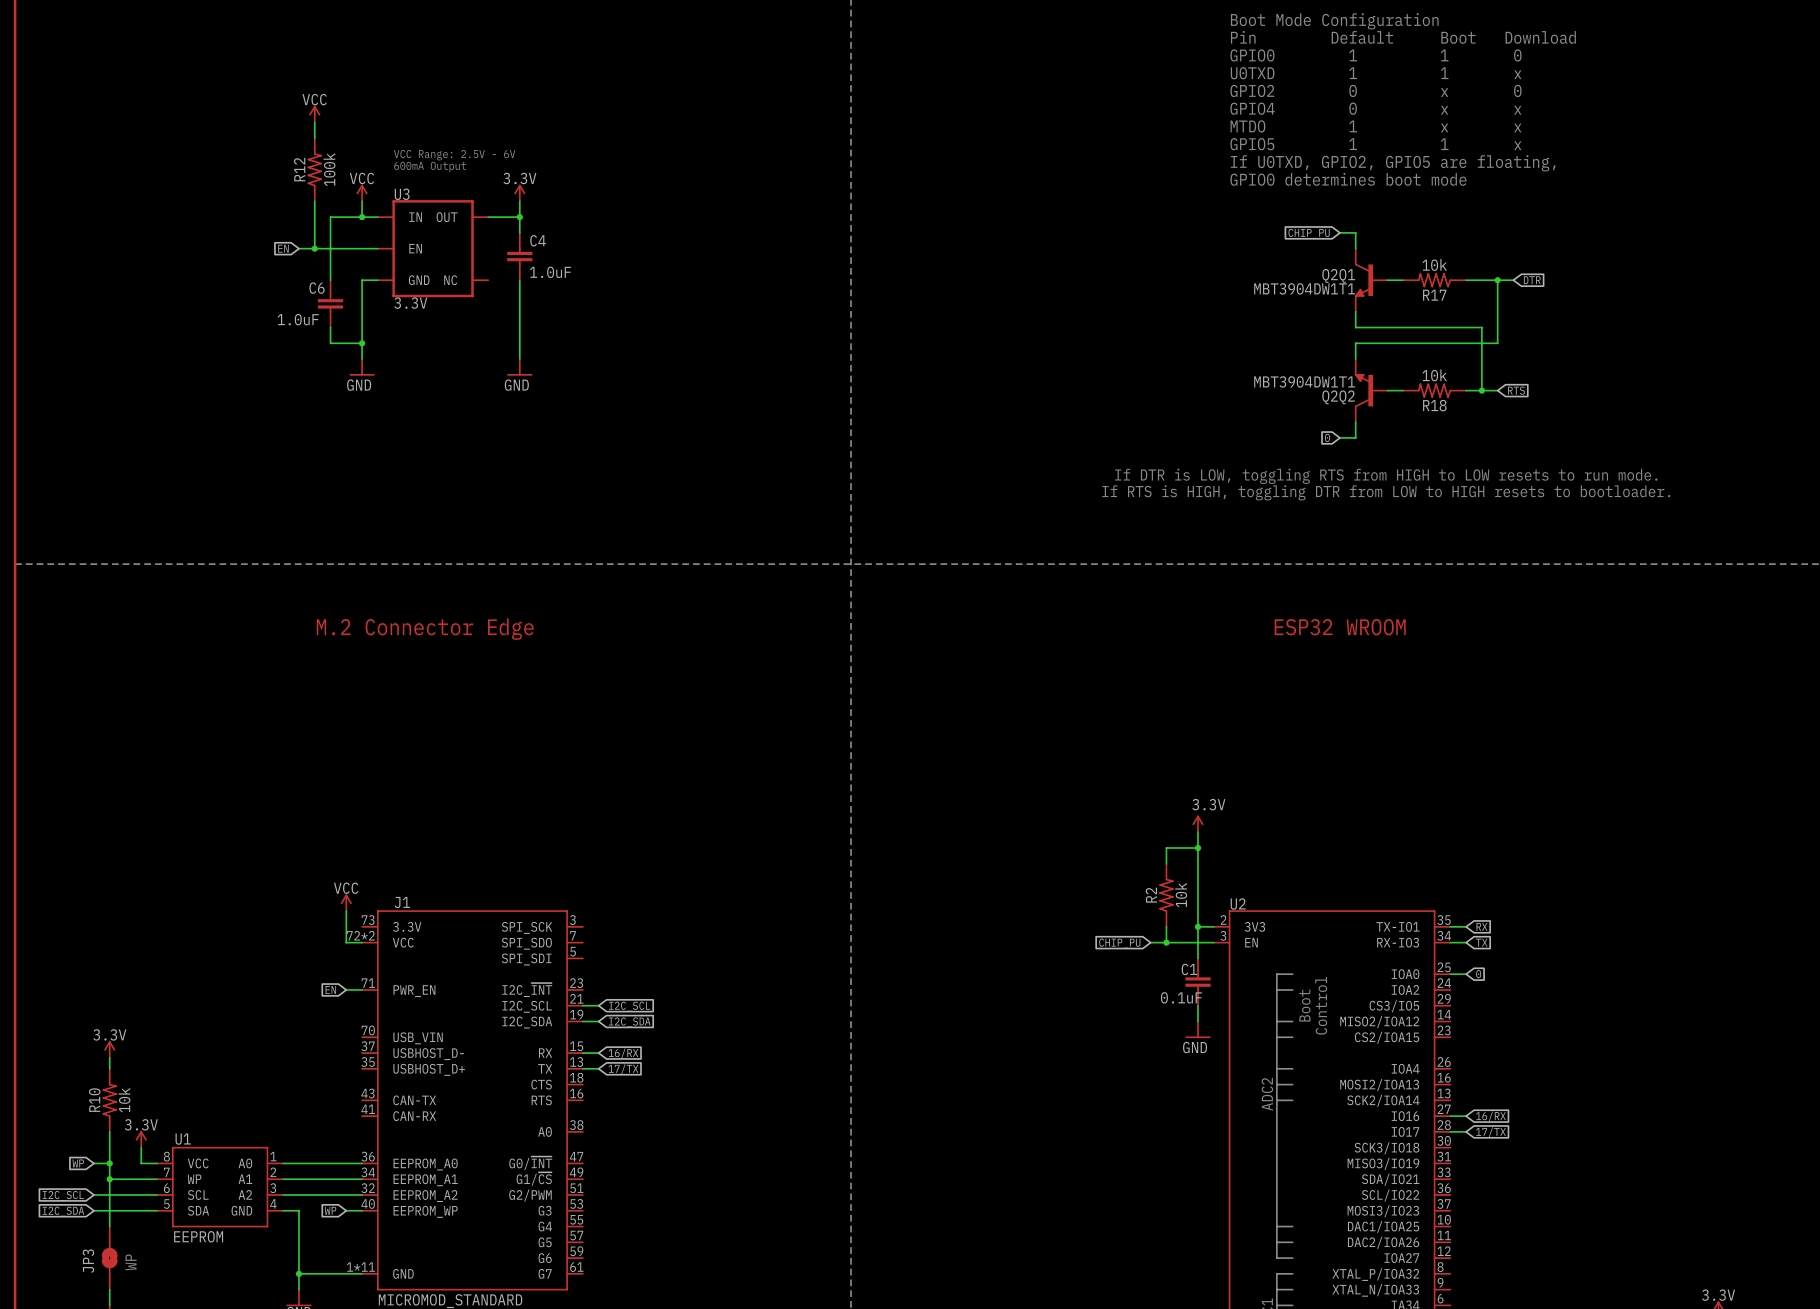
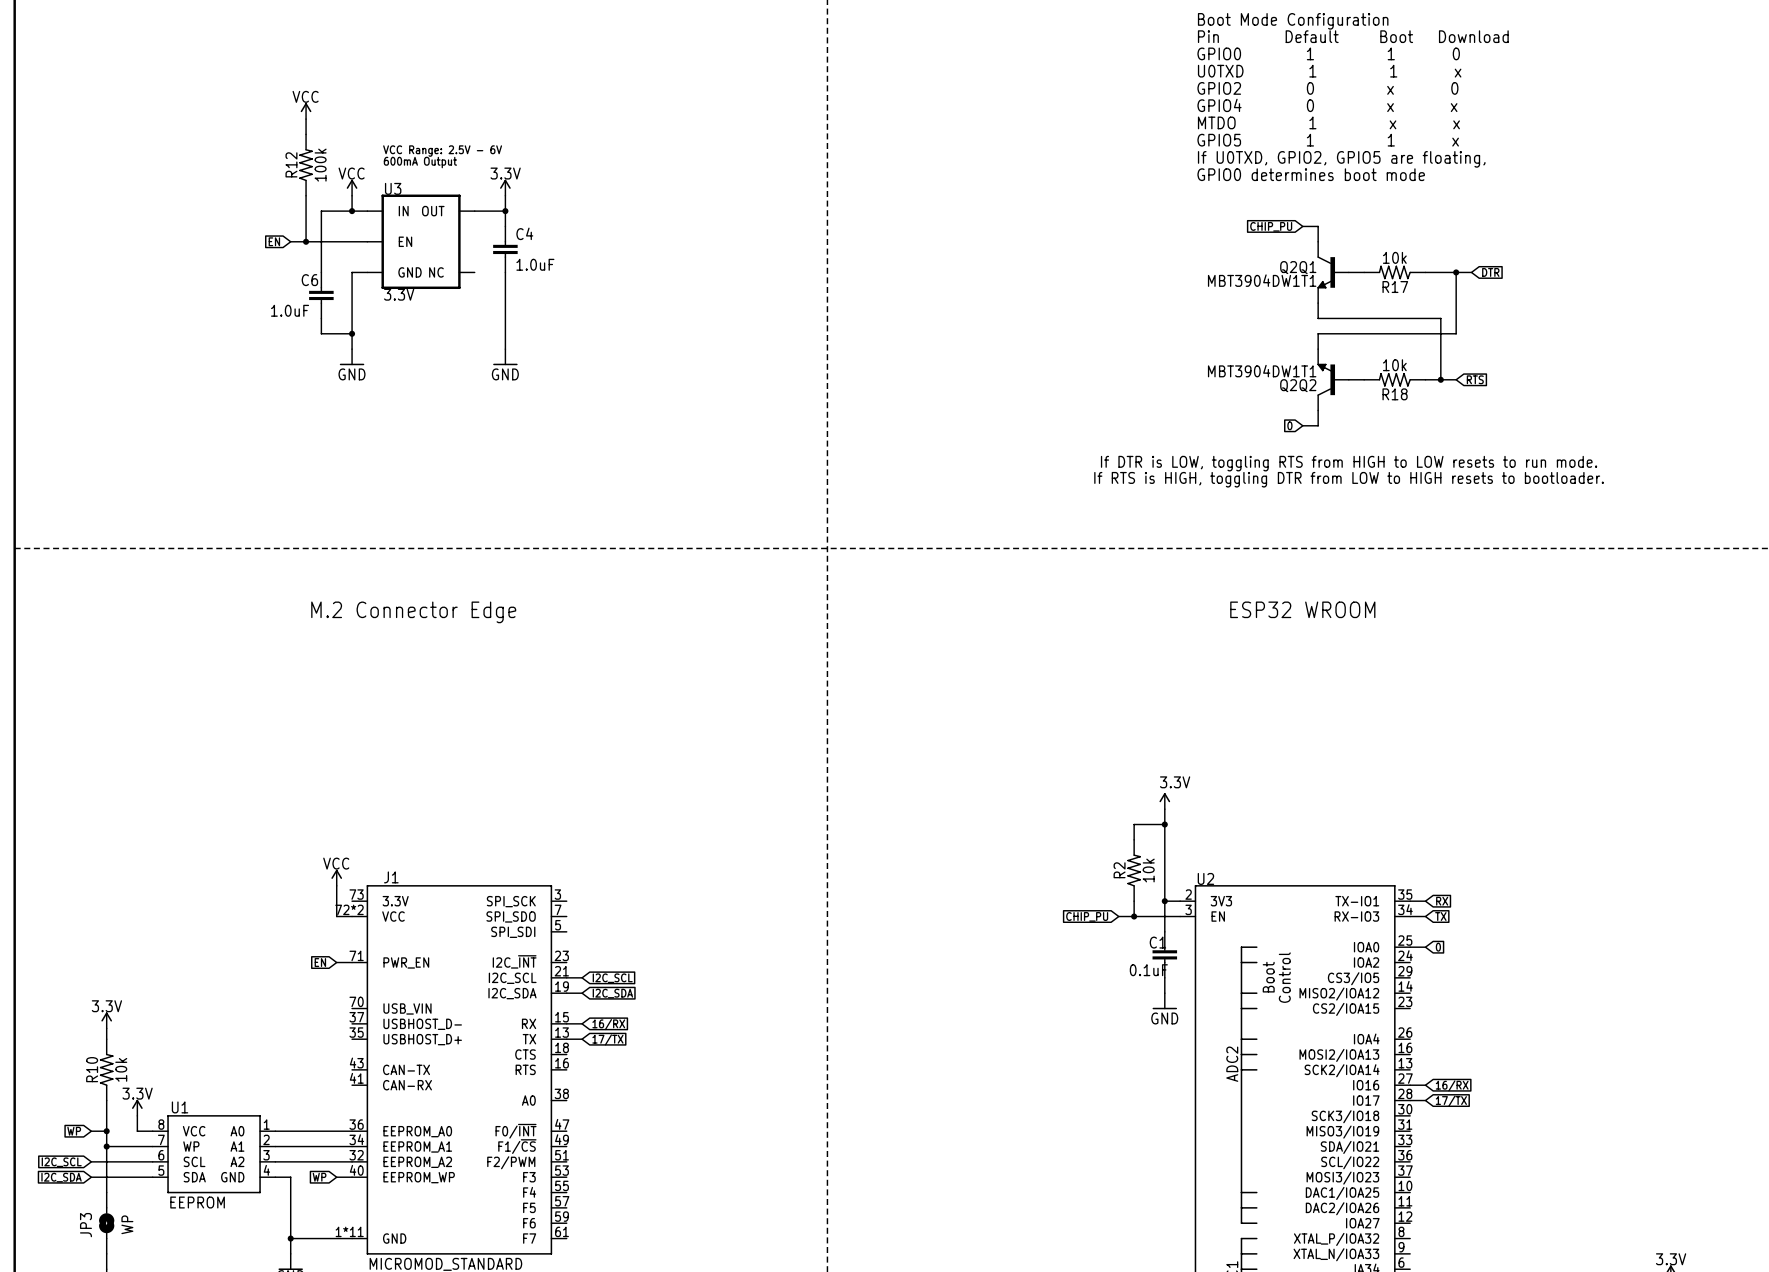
J1 pin name: G0/~{INT} (530, 1163) -> F0/~{INT} (516, 1131)
J1 pin name: G1/~{CS} (534, 1179) -> F1/~{CS} (517, 1146)
J1 pin name: G2/PWM (530, 1195) -> F2/PWM (511, 1162)
J1 pin name: G3 (545, 1210) -> F3 (529, 1177)
J1 pin name: G4 (545, 1226) -> F4 (529, 1192)
J1 pin name: G5 (545, 1242) -> F5 (529, 1207)
J1 pin name: G6 (545, 1258) -> F6 (529, 1223)
J1 pin name: G7 (545, 1273) -> F7 (529, 1238)

